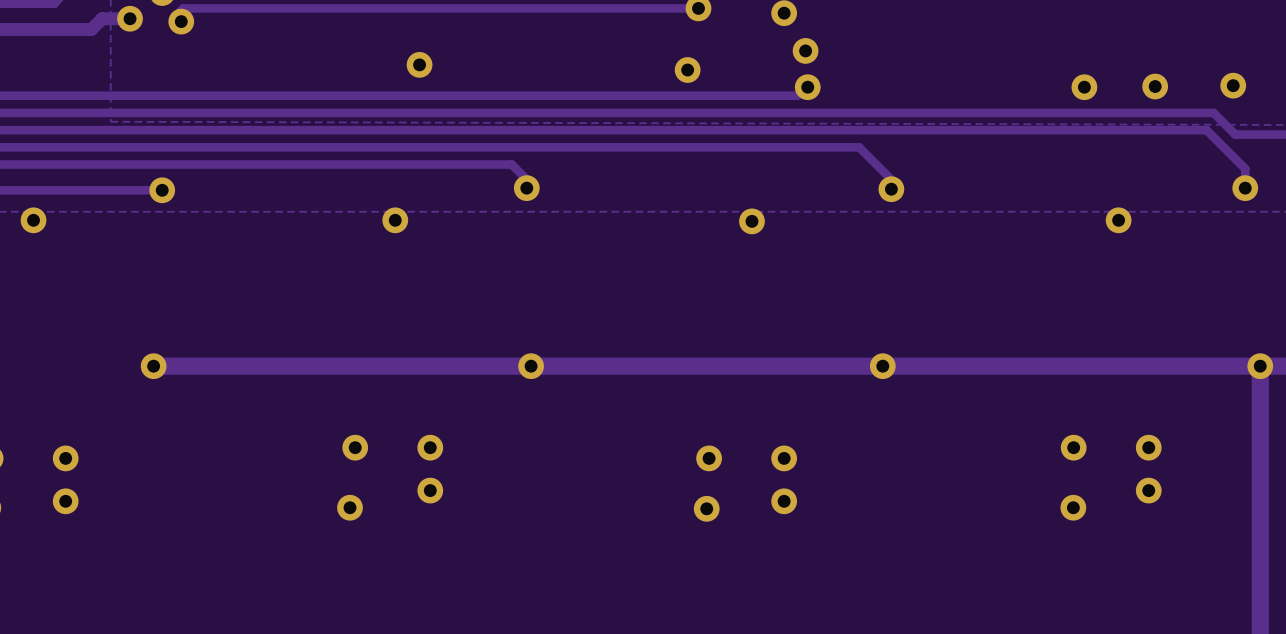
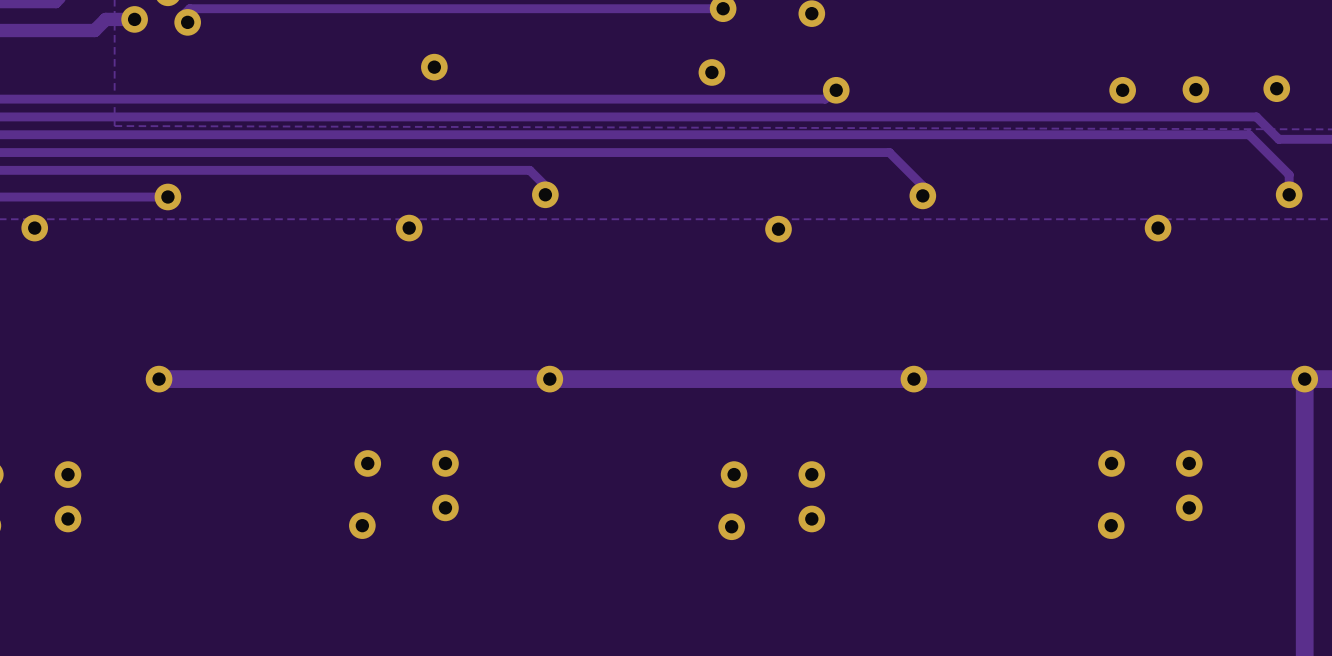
via: (805, 50) -> none

